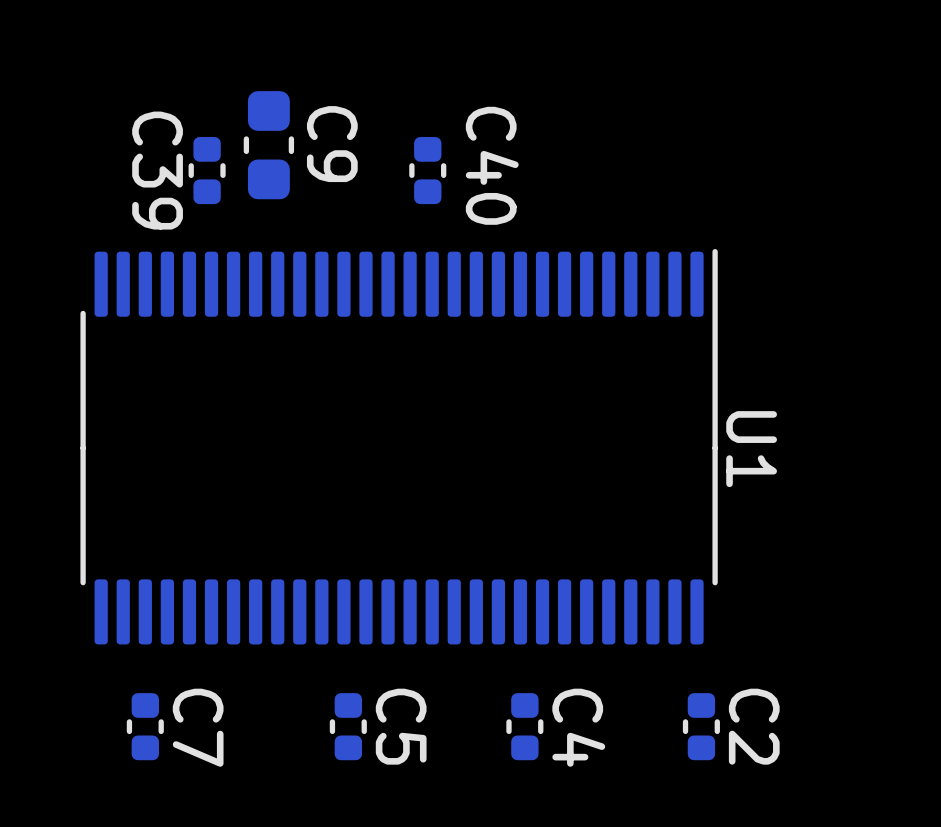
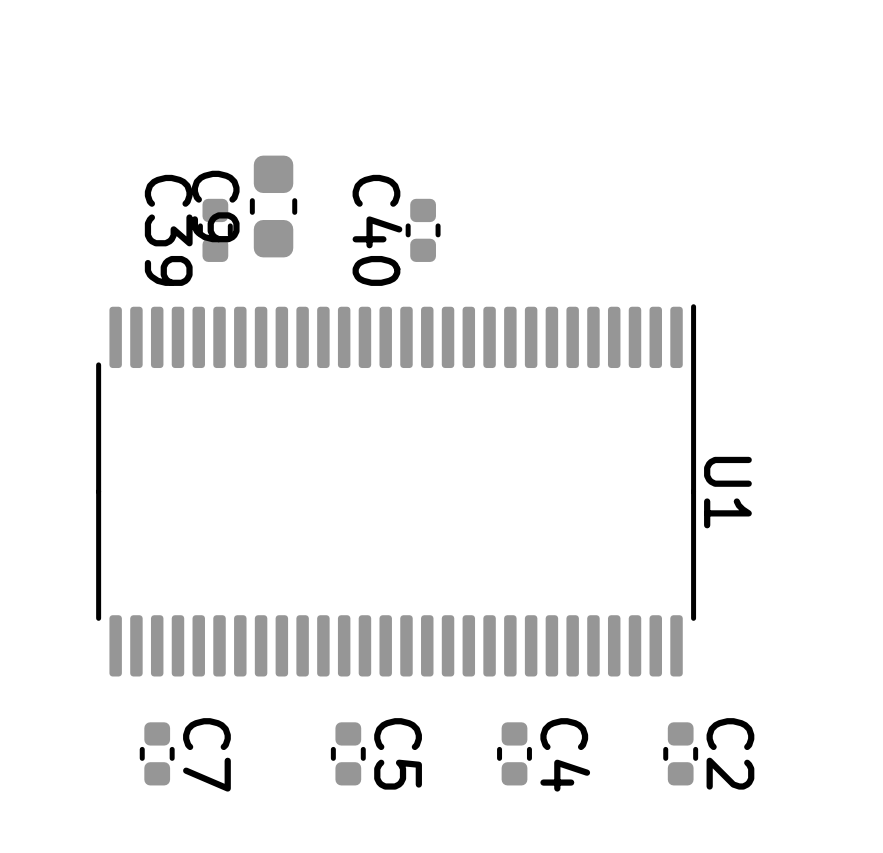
C9 name position: C9 (332, 144) -> C9 (215, 206)
C40 name position: C40 (492, 165) -> C40 (377, 230)

